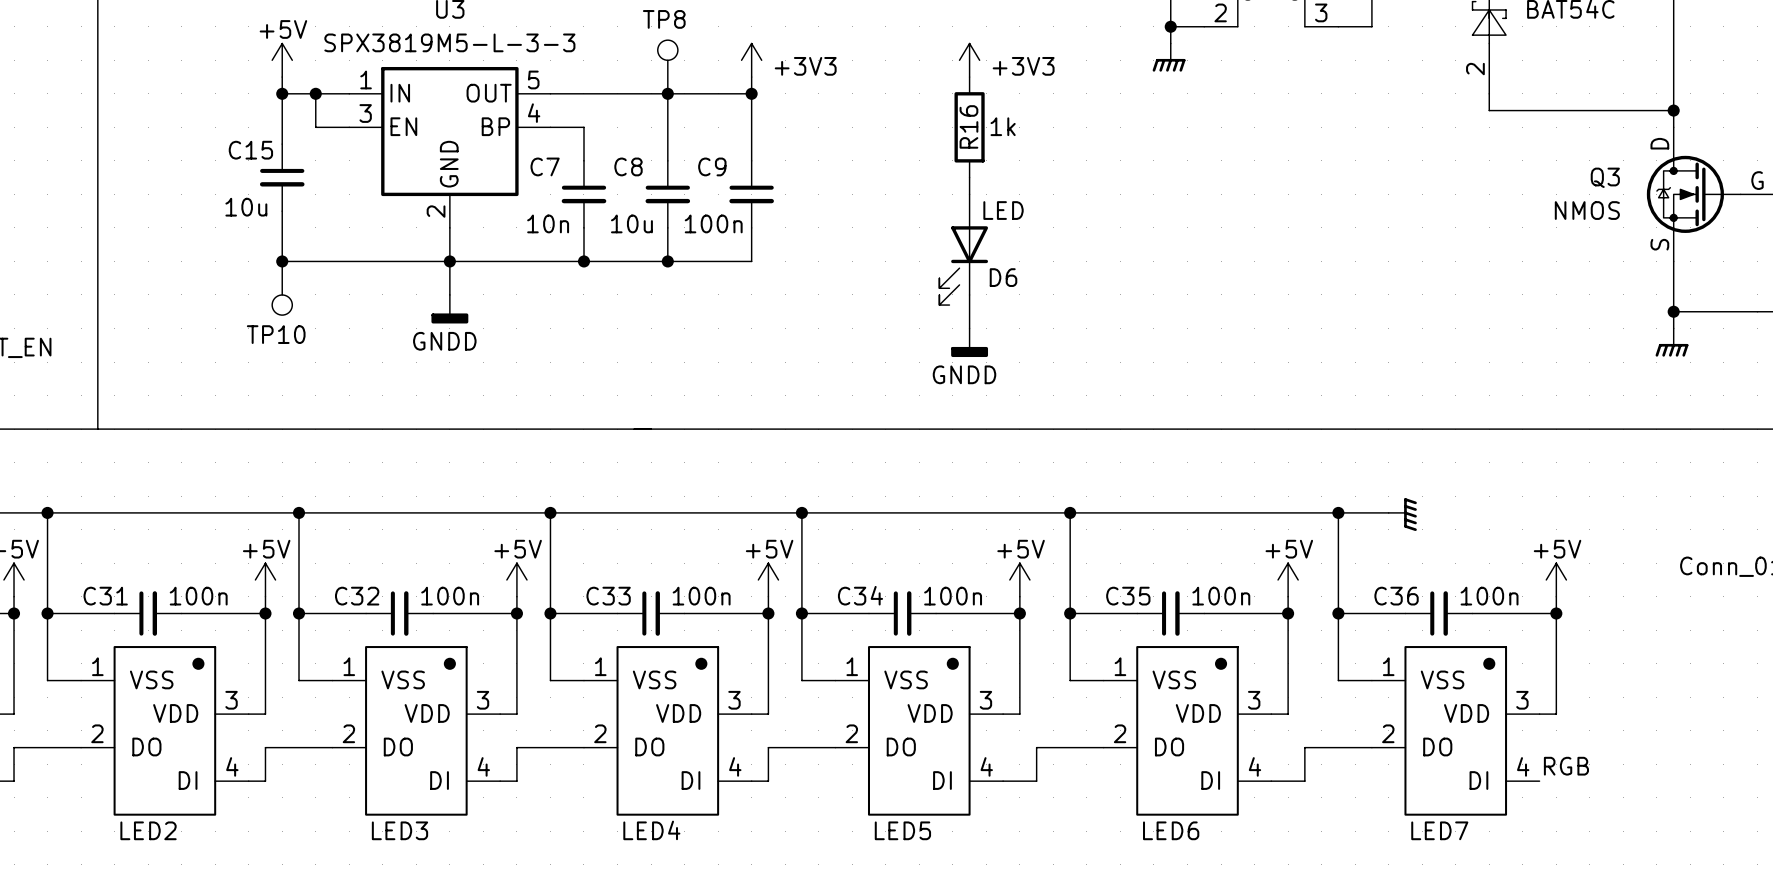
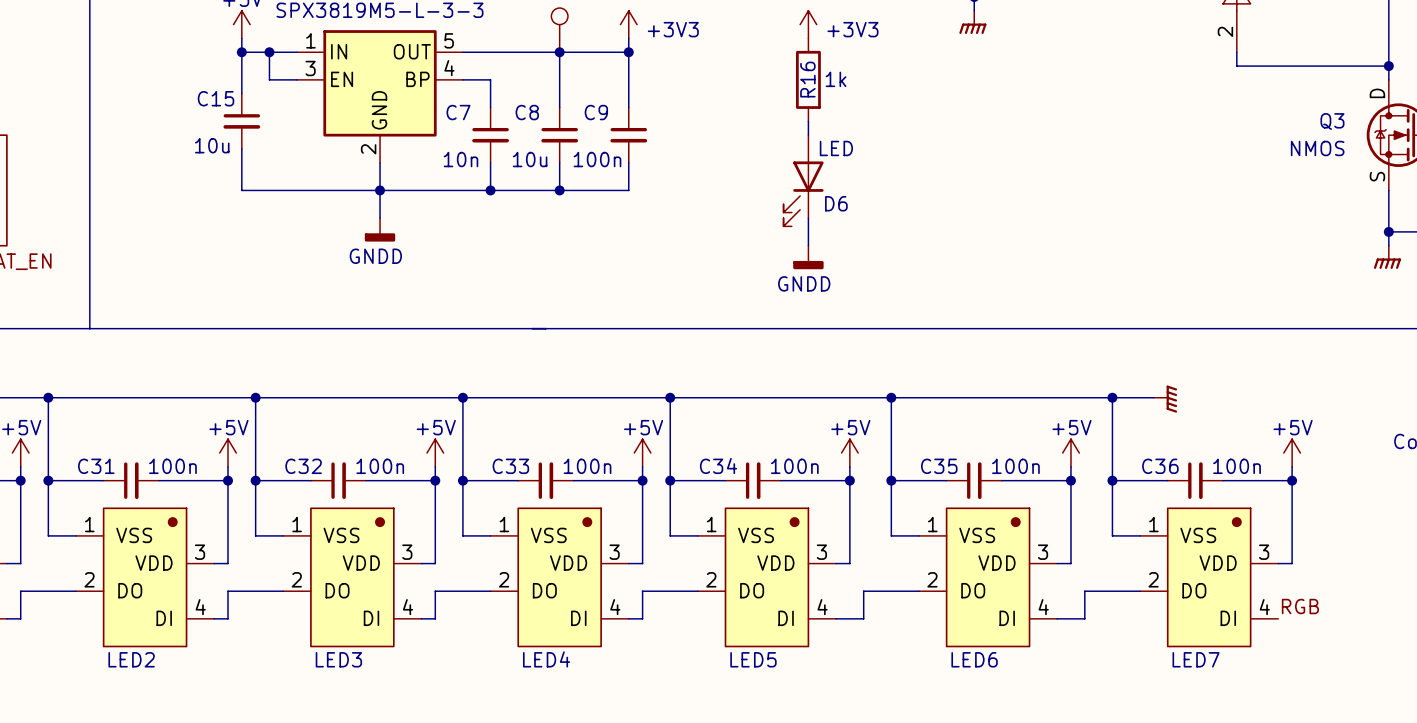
junction: (282, 261) -> none
TP10: (282, 288) -> none

